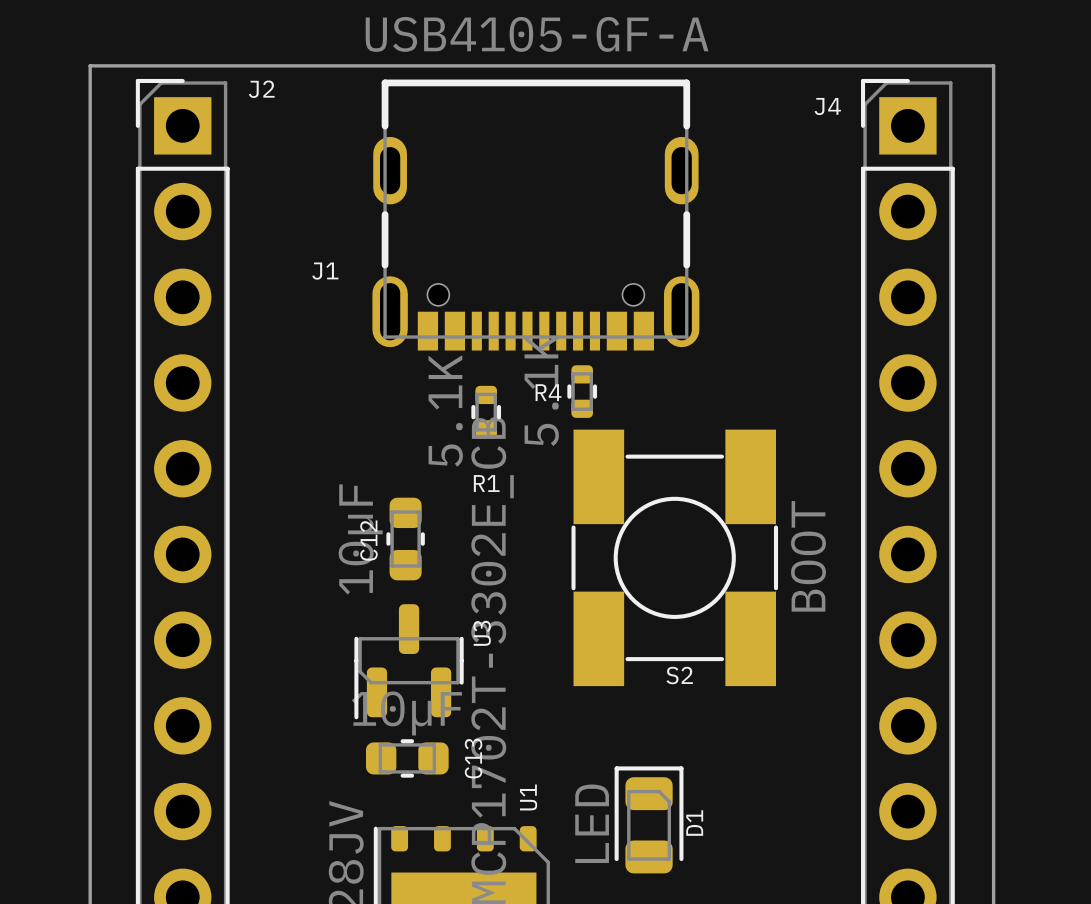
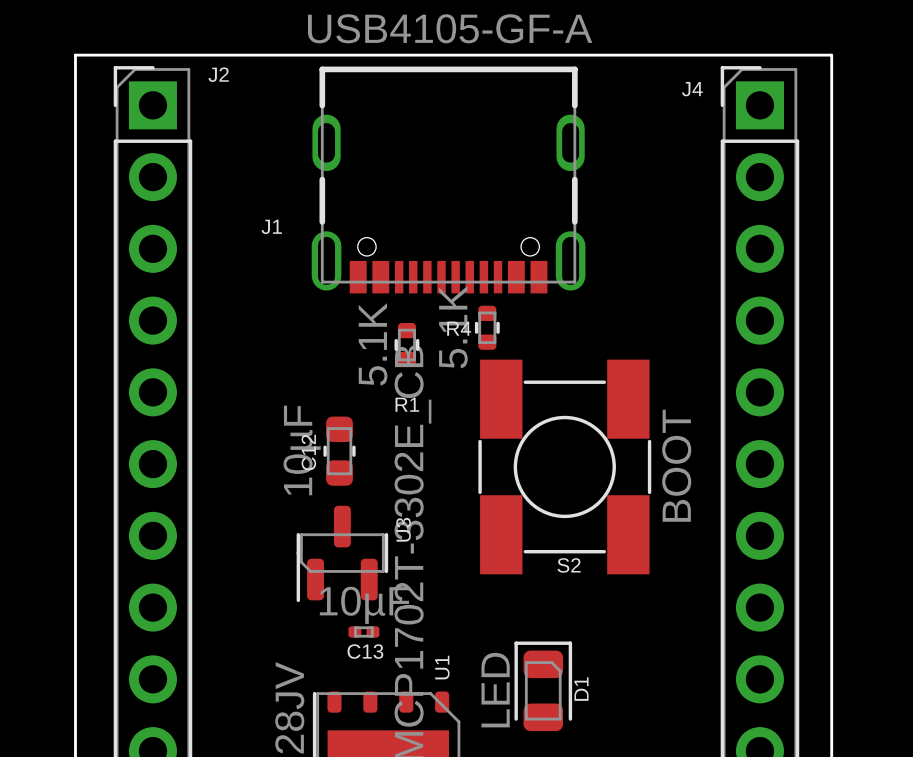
C13 footprint: [365, 739, 449, 778] -> [348, 626, 380, 638]
C13 name position: C13 (473, 758) -> C13 (365, 651)

